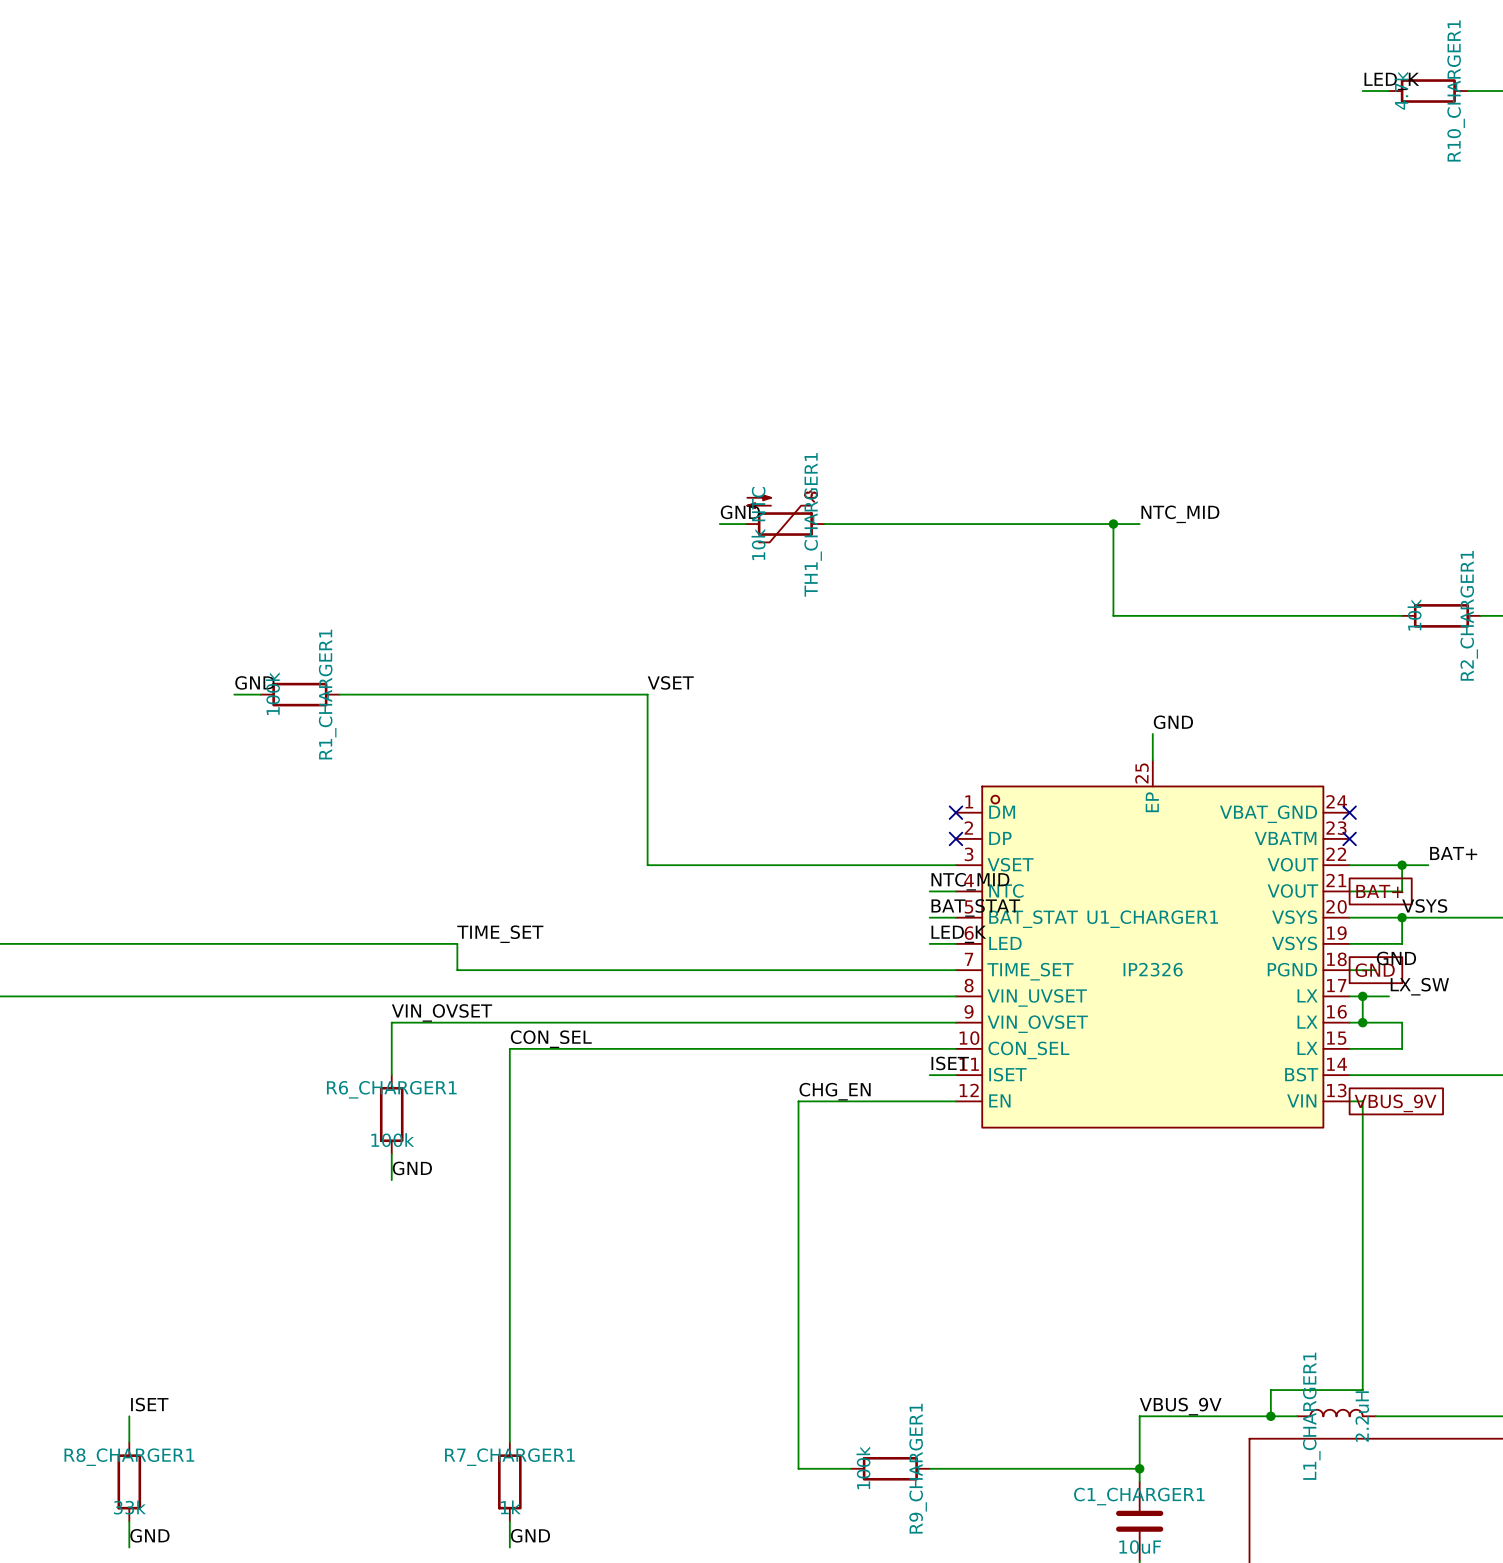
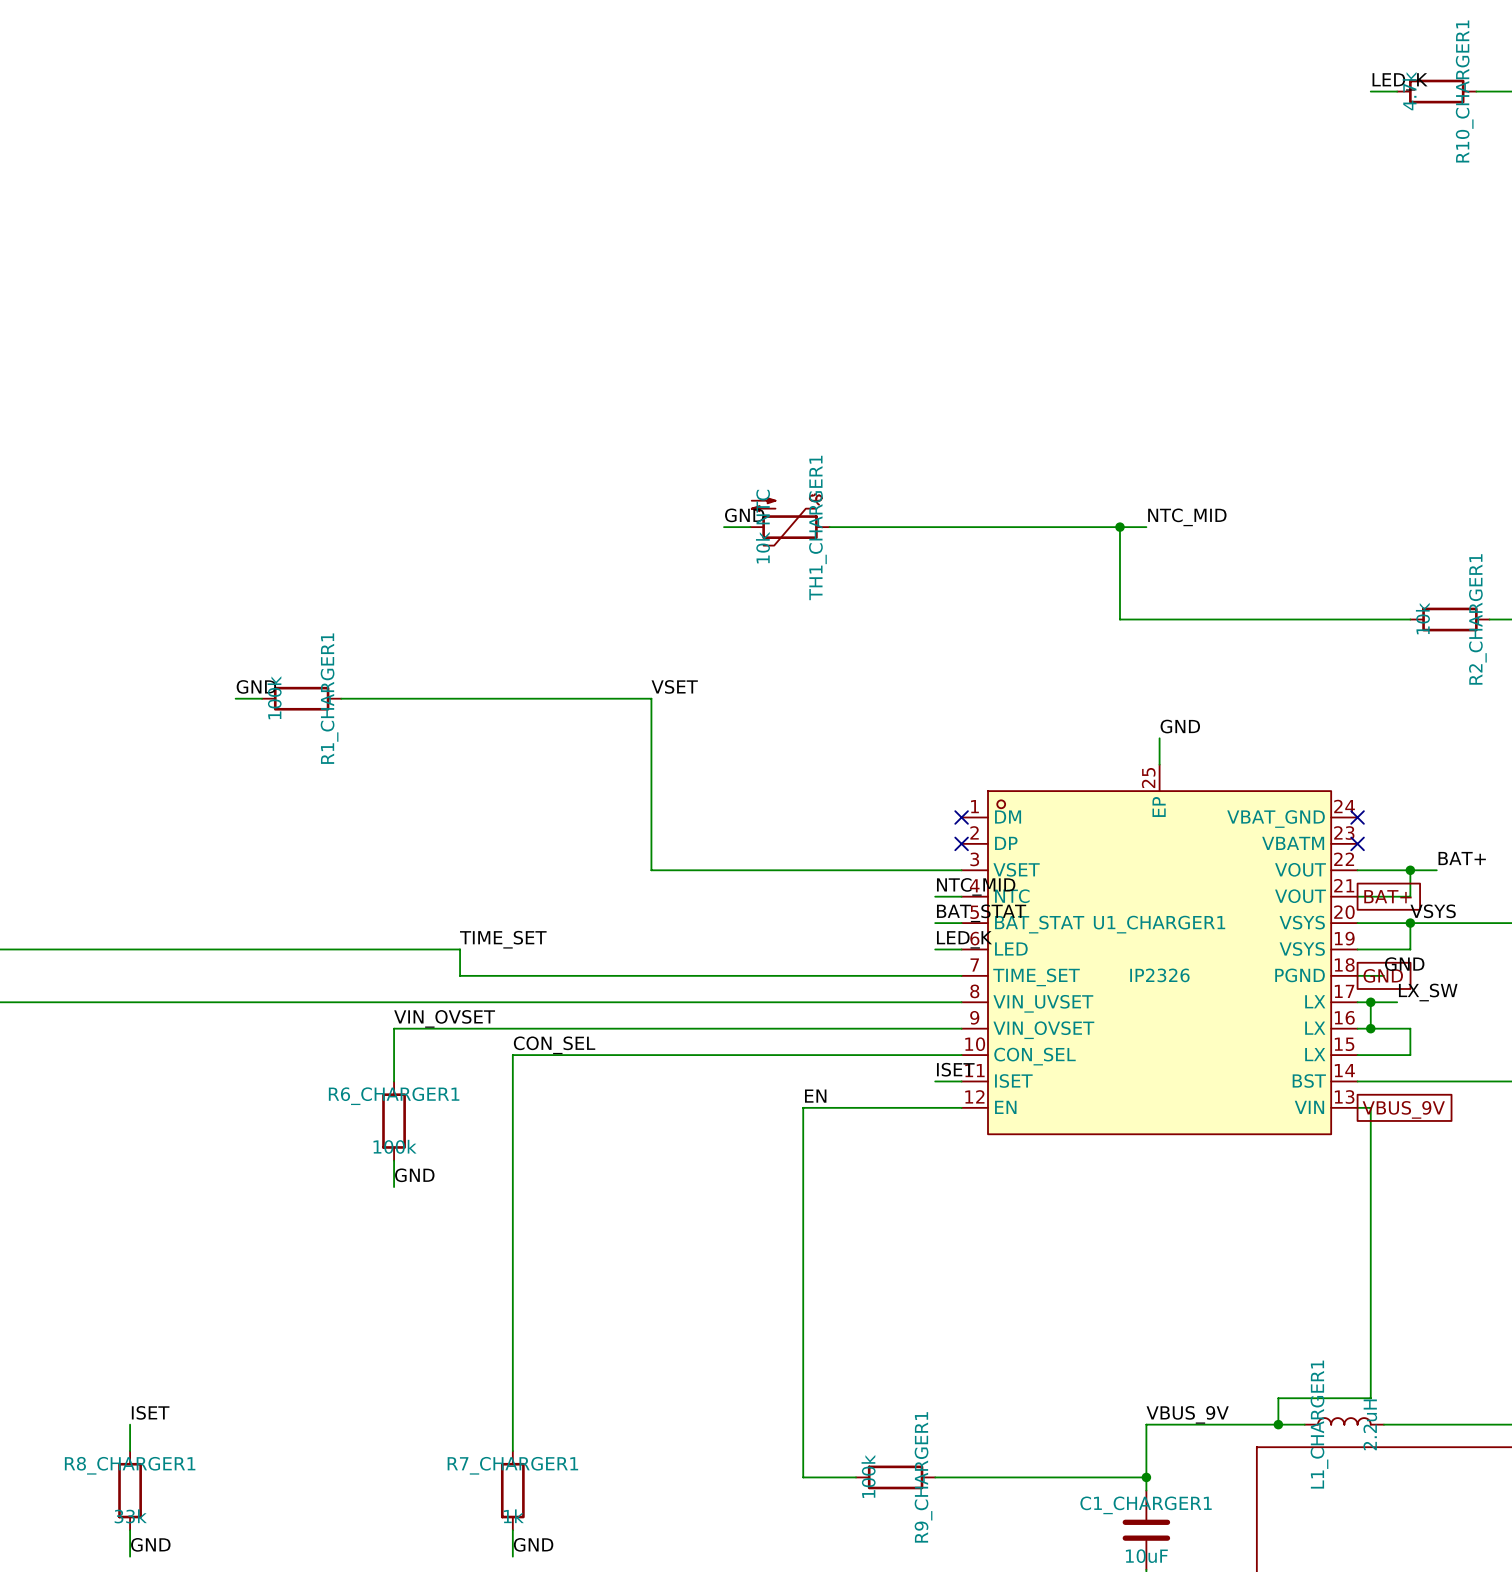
label: CHG_EN (835, 1091) -> EN (815, 1096)

